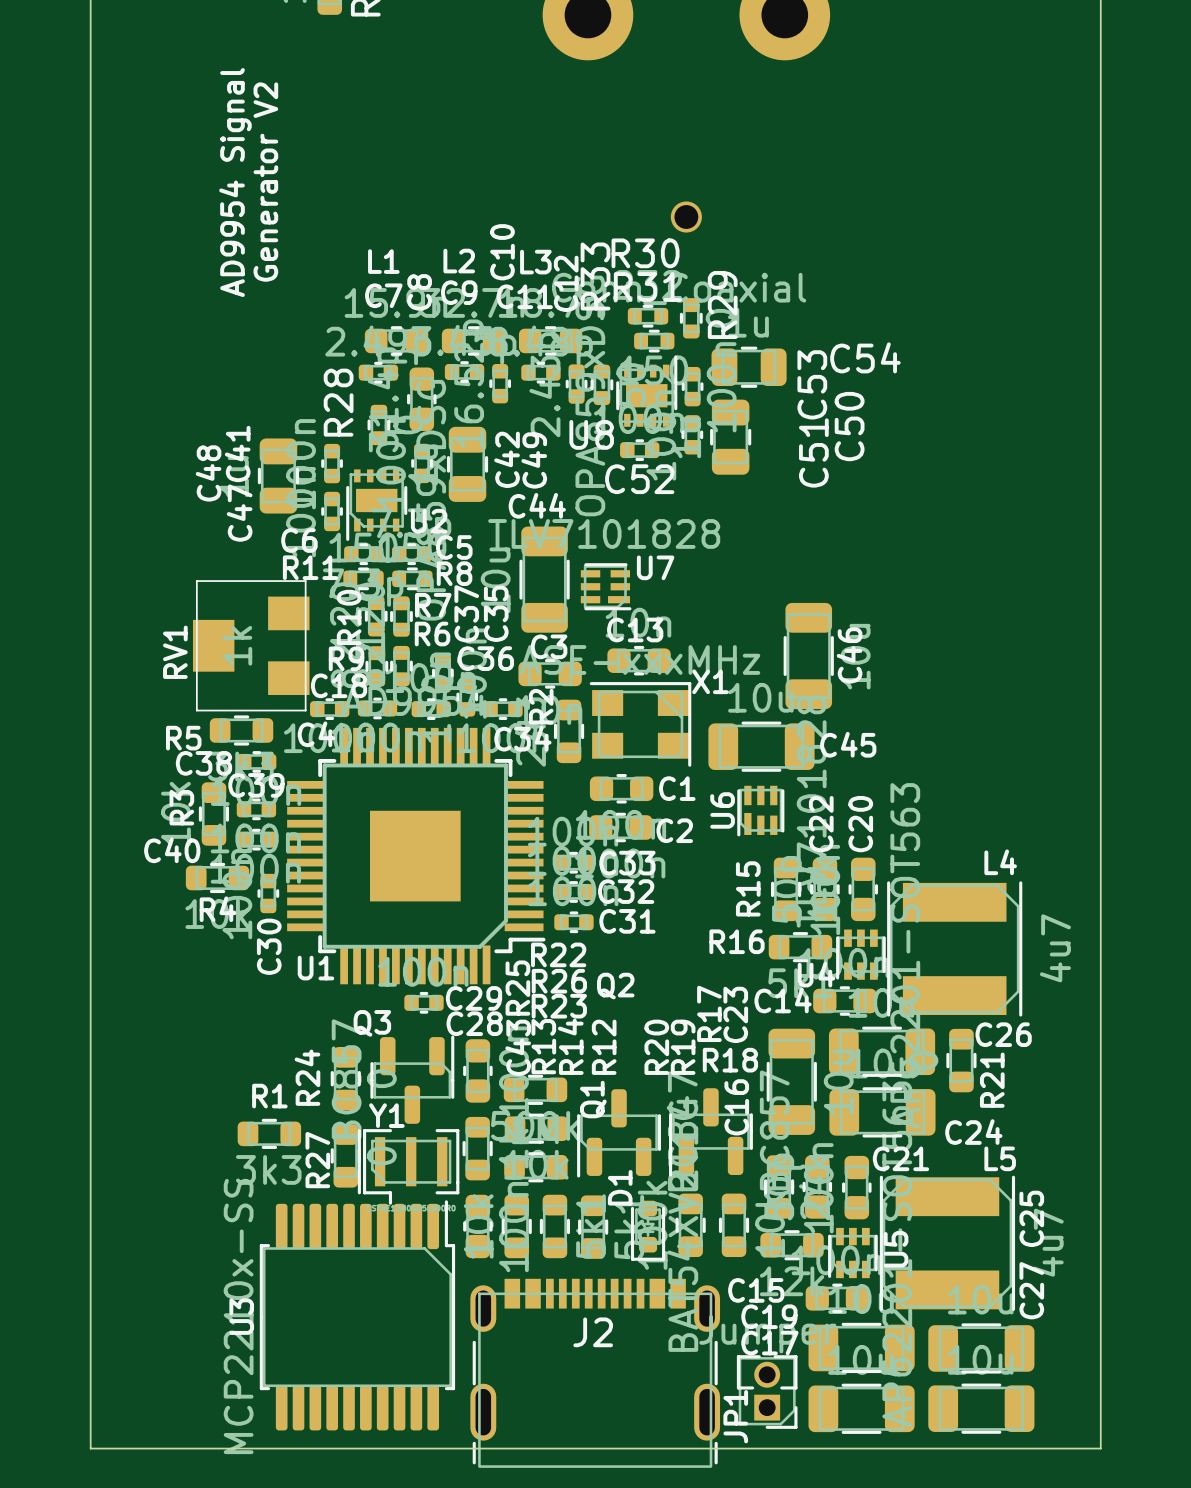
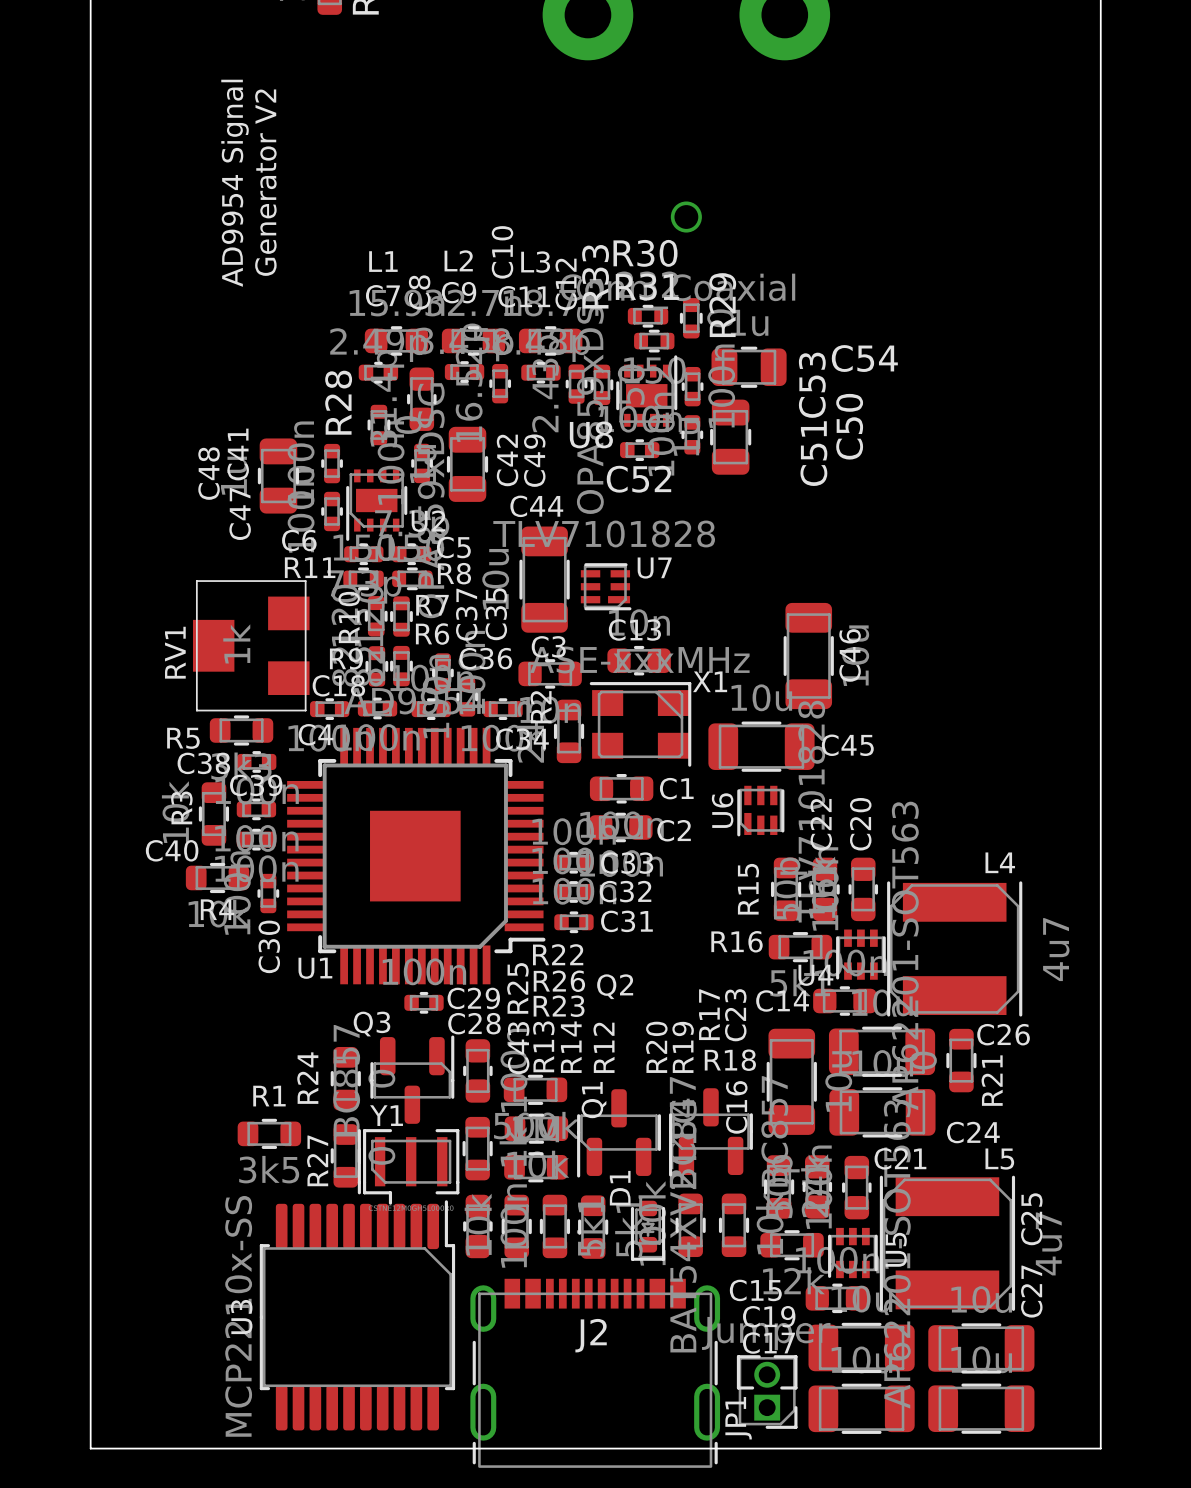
R1 value: 3k3 (268, 1169) -> 3k5 (269, 1169)

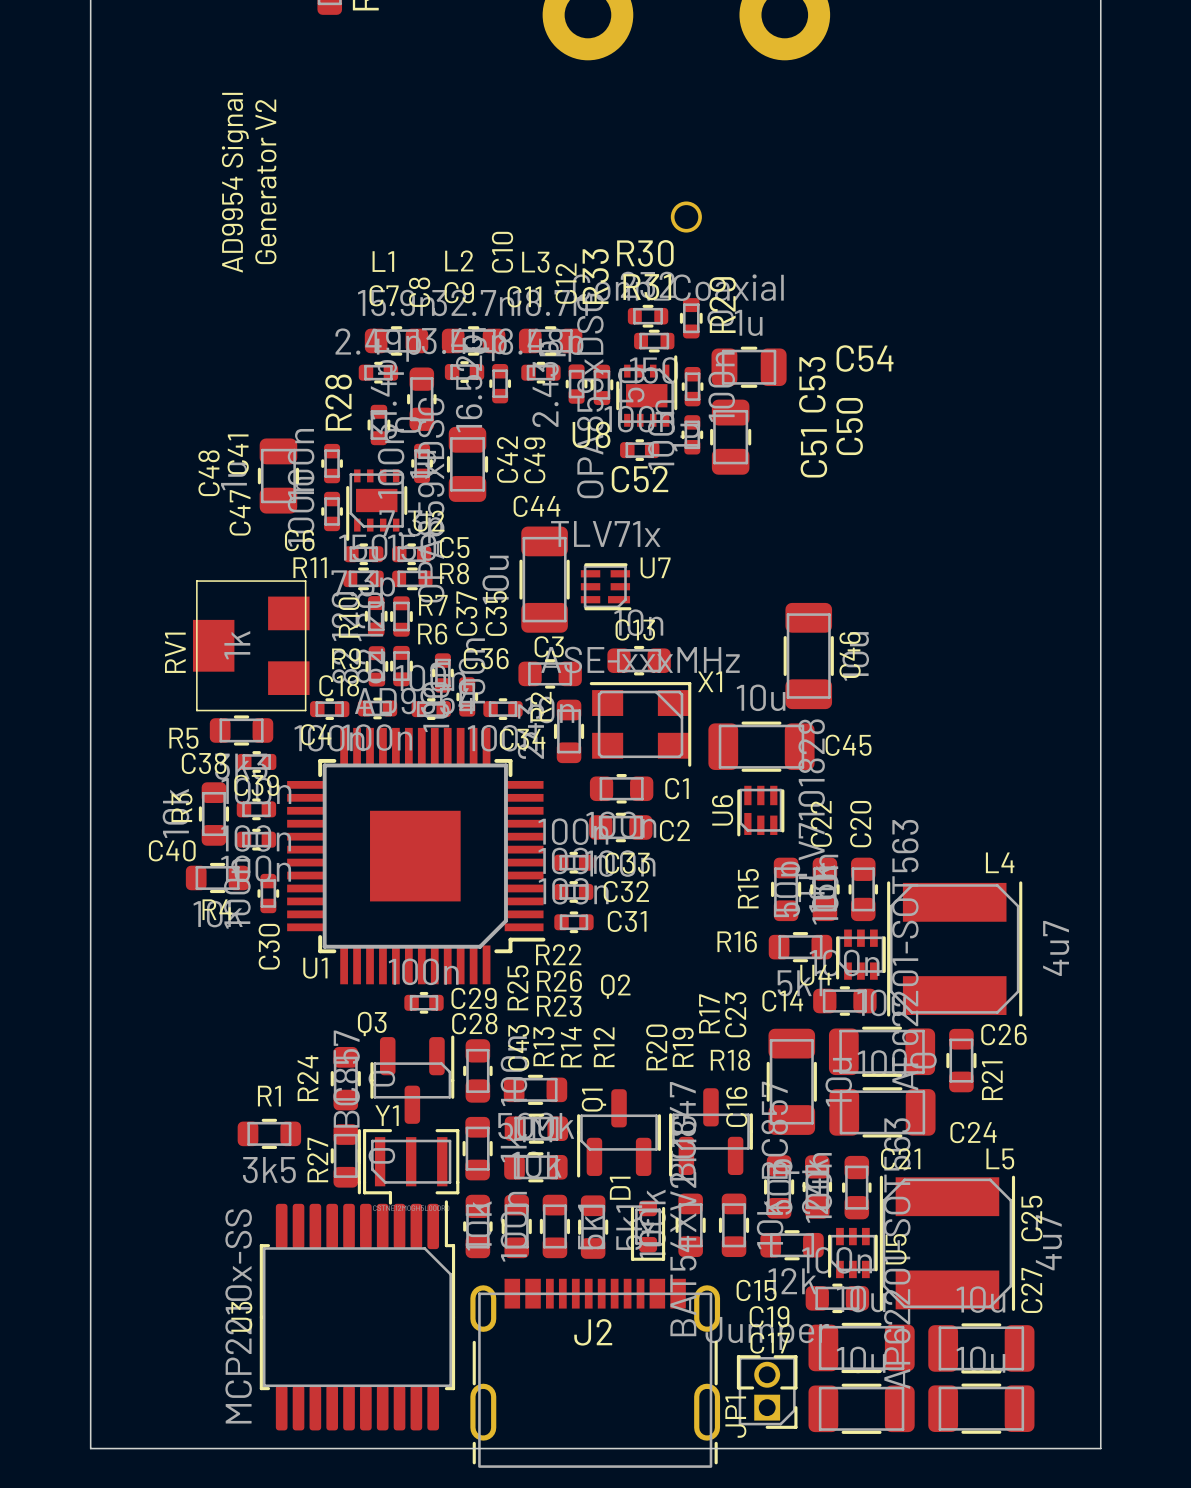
U7 value: TLV7101828 (604, 533) -> TLV71x (605, 533)

